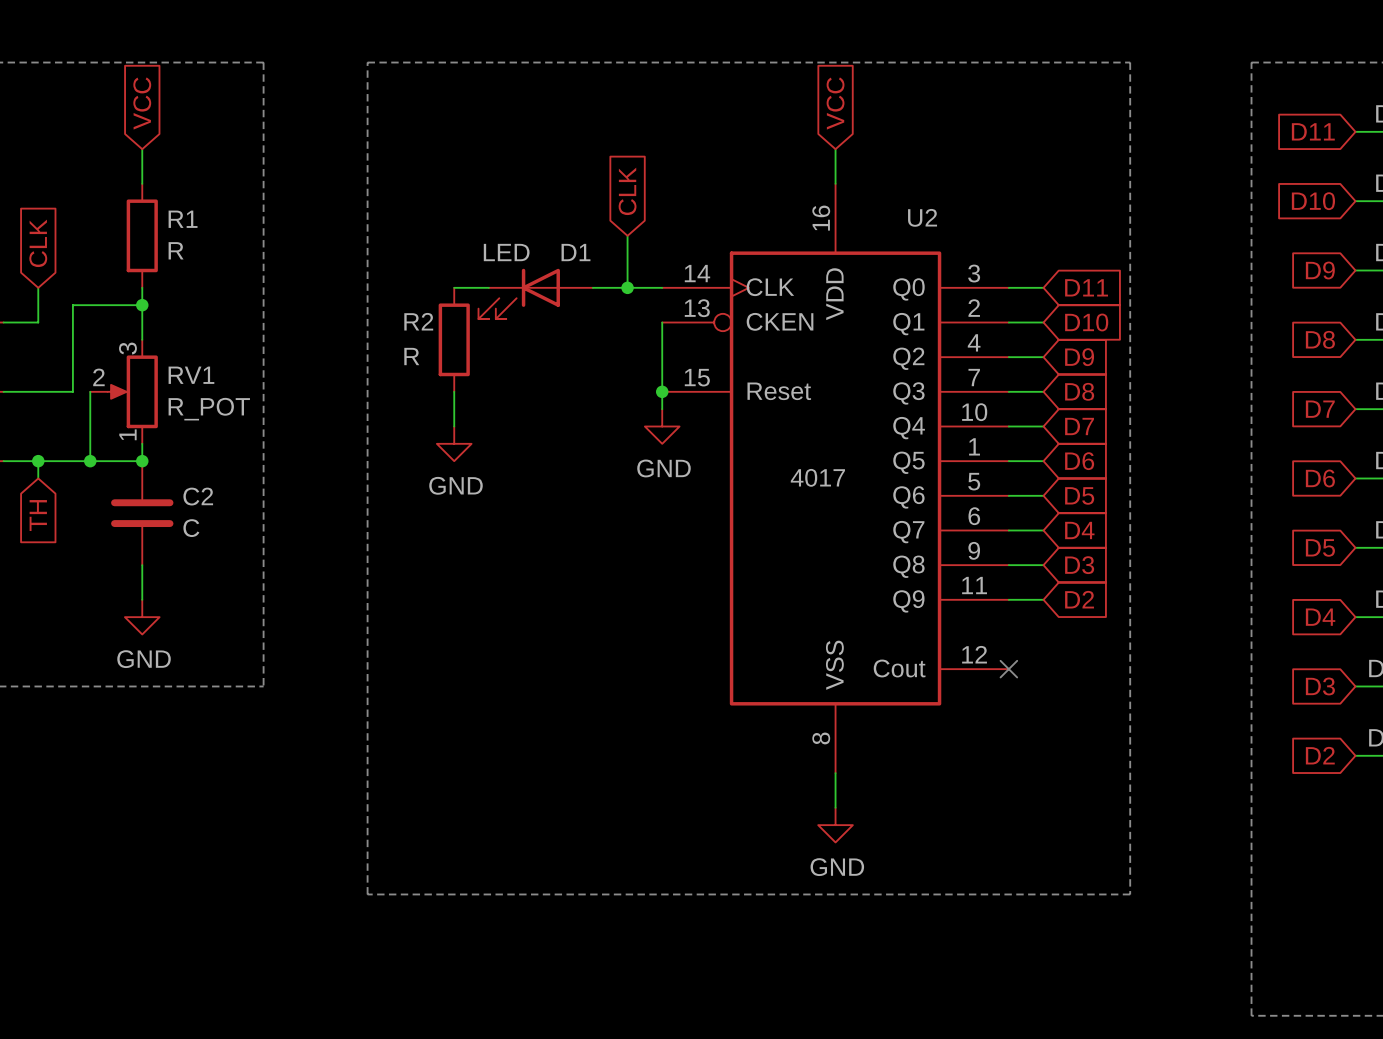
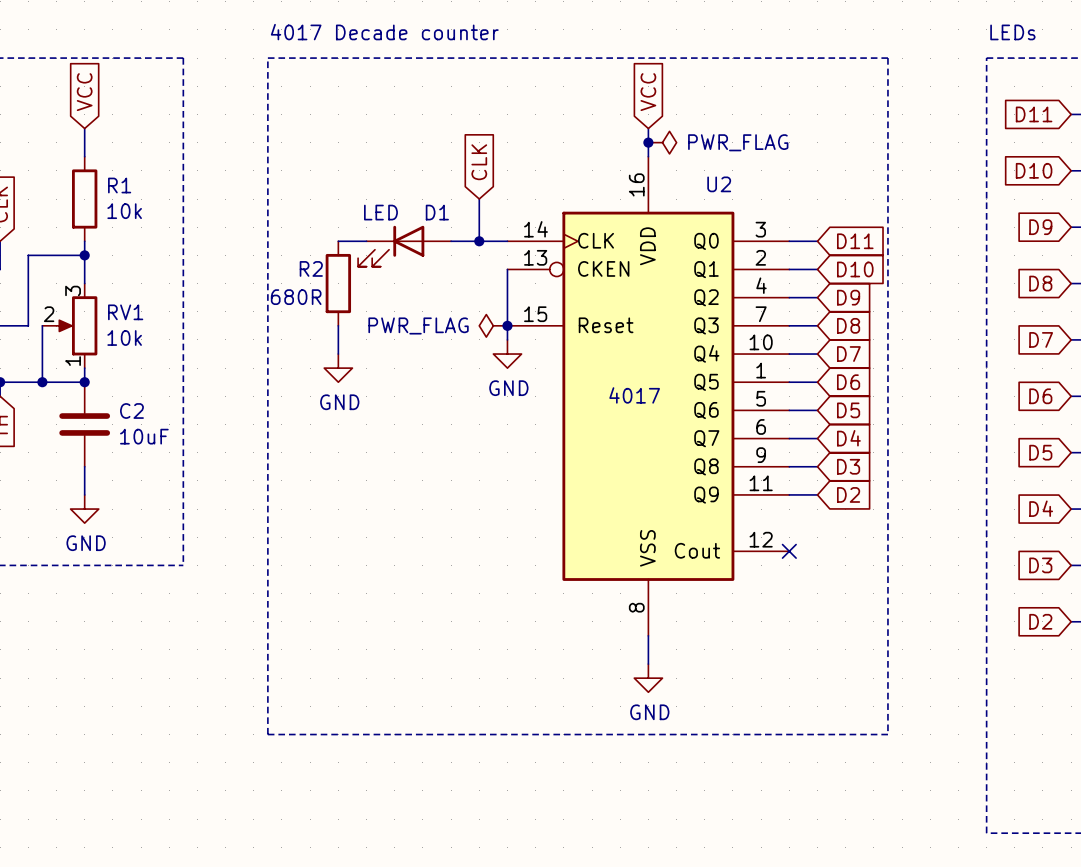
text: none -> 4017 Decade counter (384, 32)
text: none -> LEDs (1012, 32)
junction: none -> (648, 142)
power symbol: none -> PWR_FLAG (662, 142)
R1 value: R (176, 250) -> 10k (124, 211)
R2 value: R (411, 356) -> 680R (296, 297)
power symbol: none -> PWR_FLAG (493, 325)
RV1 value: R_POT (209, 409) -> 10k (124, 337)
C2 value: C (191, 528) -> 10uF (144, 436)

